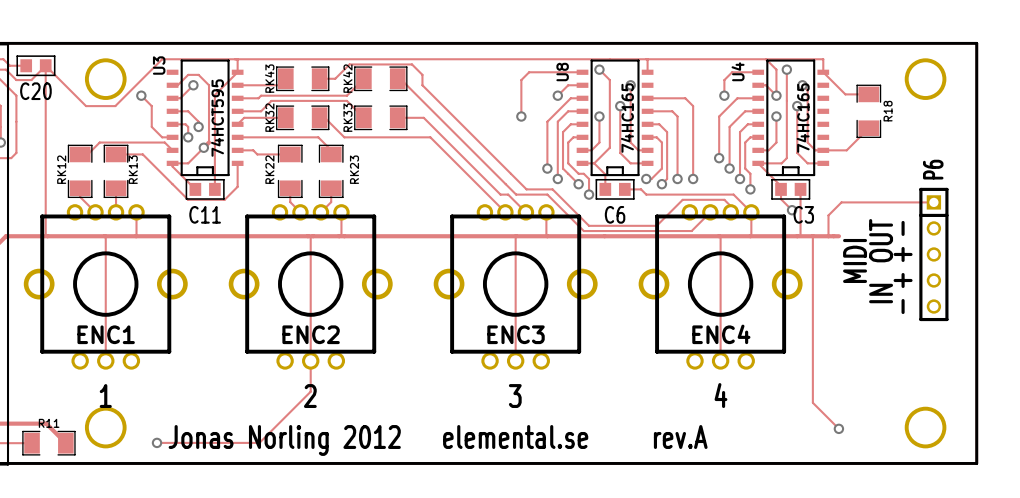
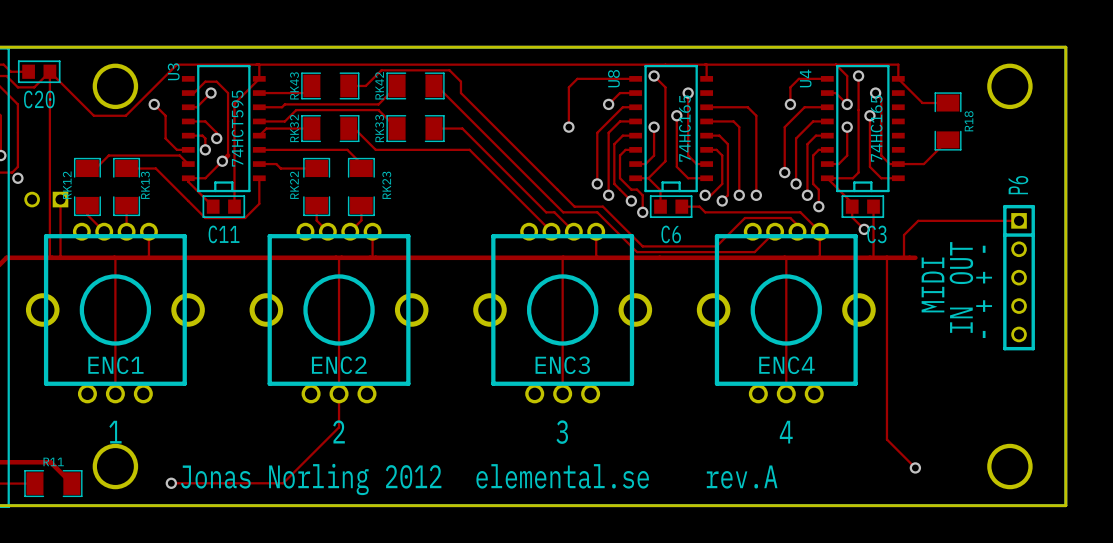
via: none -> (17, 178)
part: none -> (46, 199)
track: none -> (60, 199) (60, 257)

